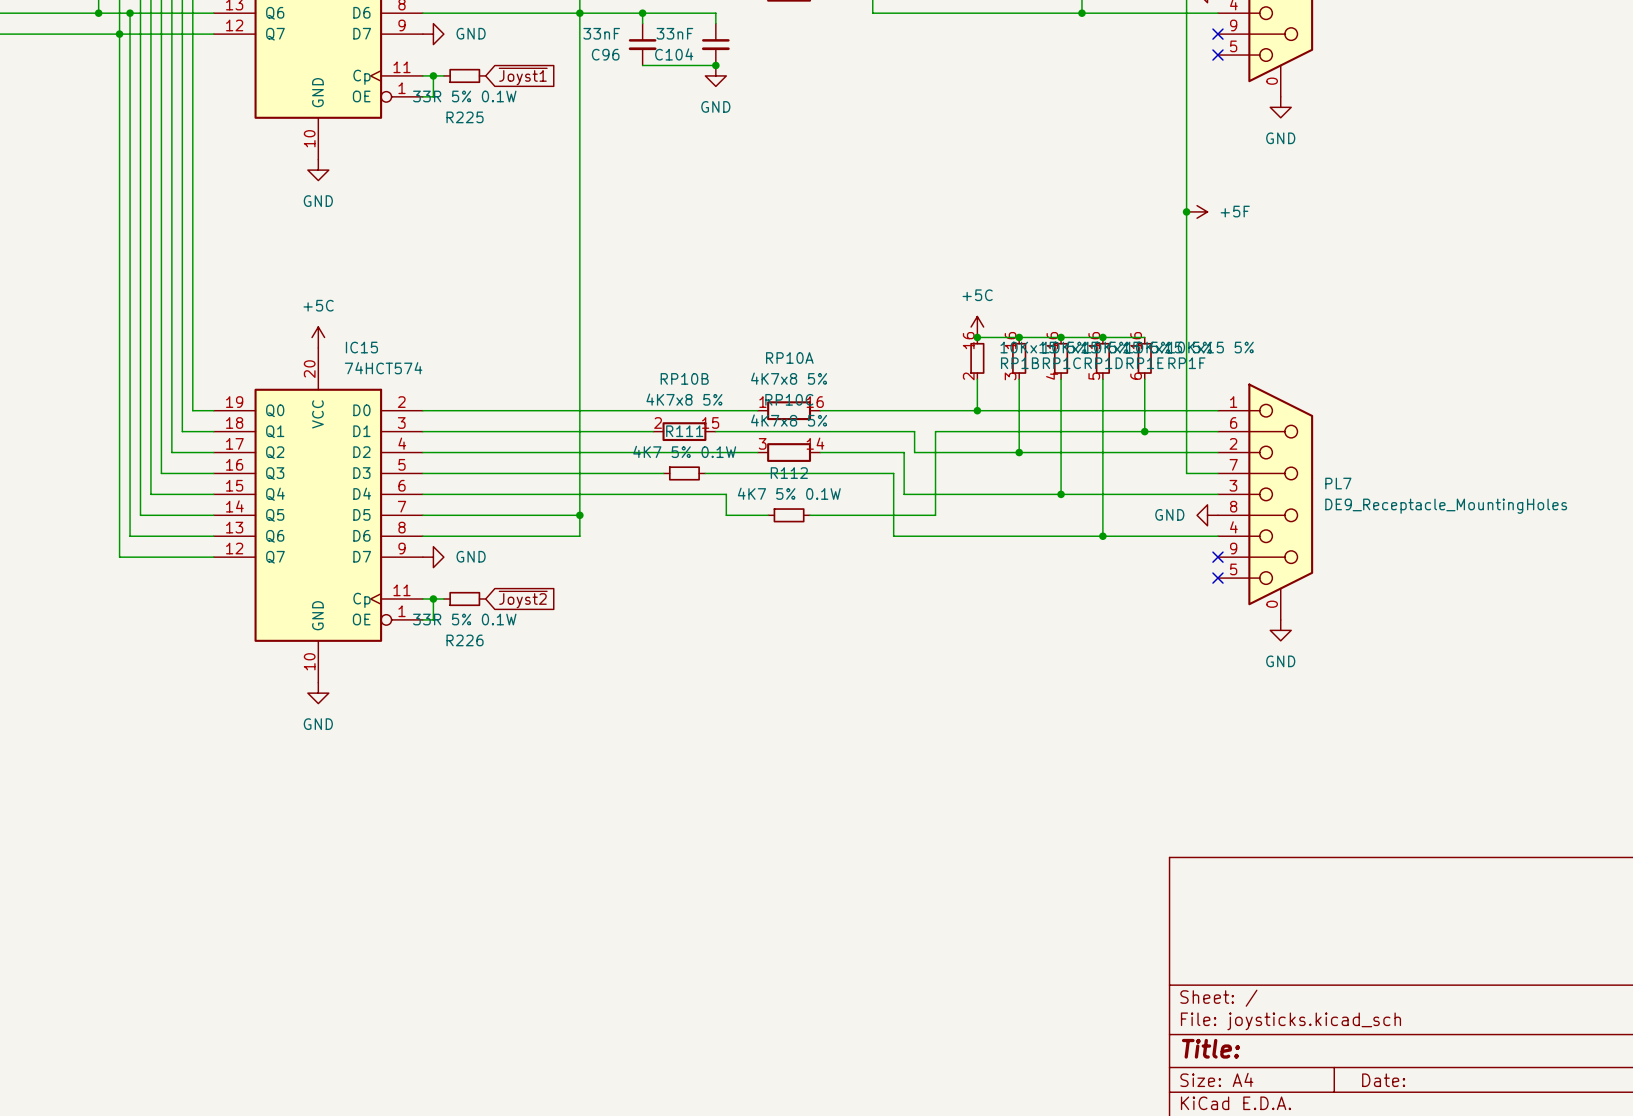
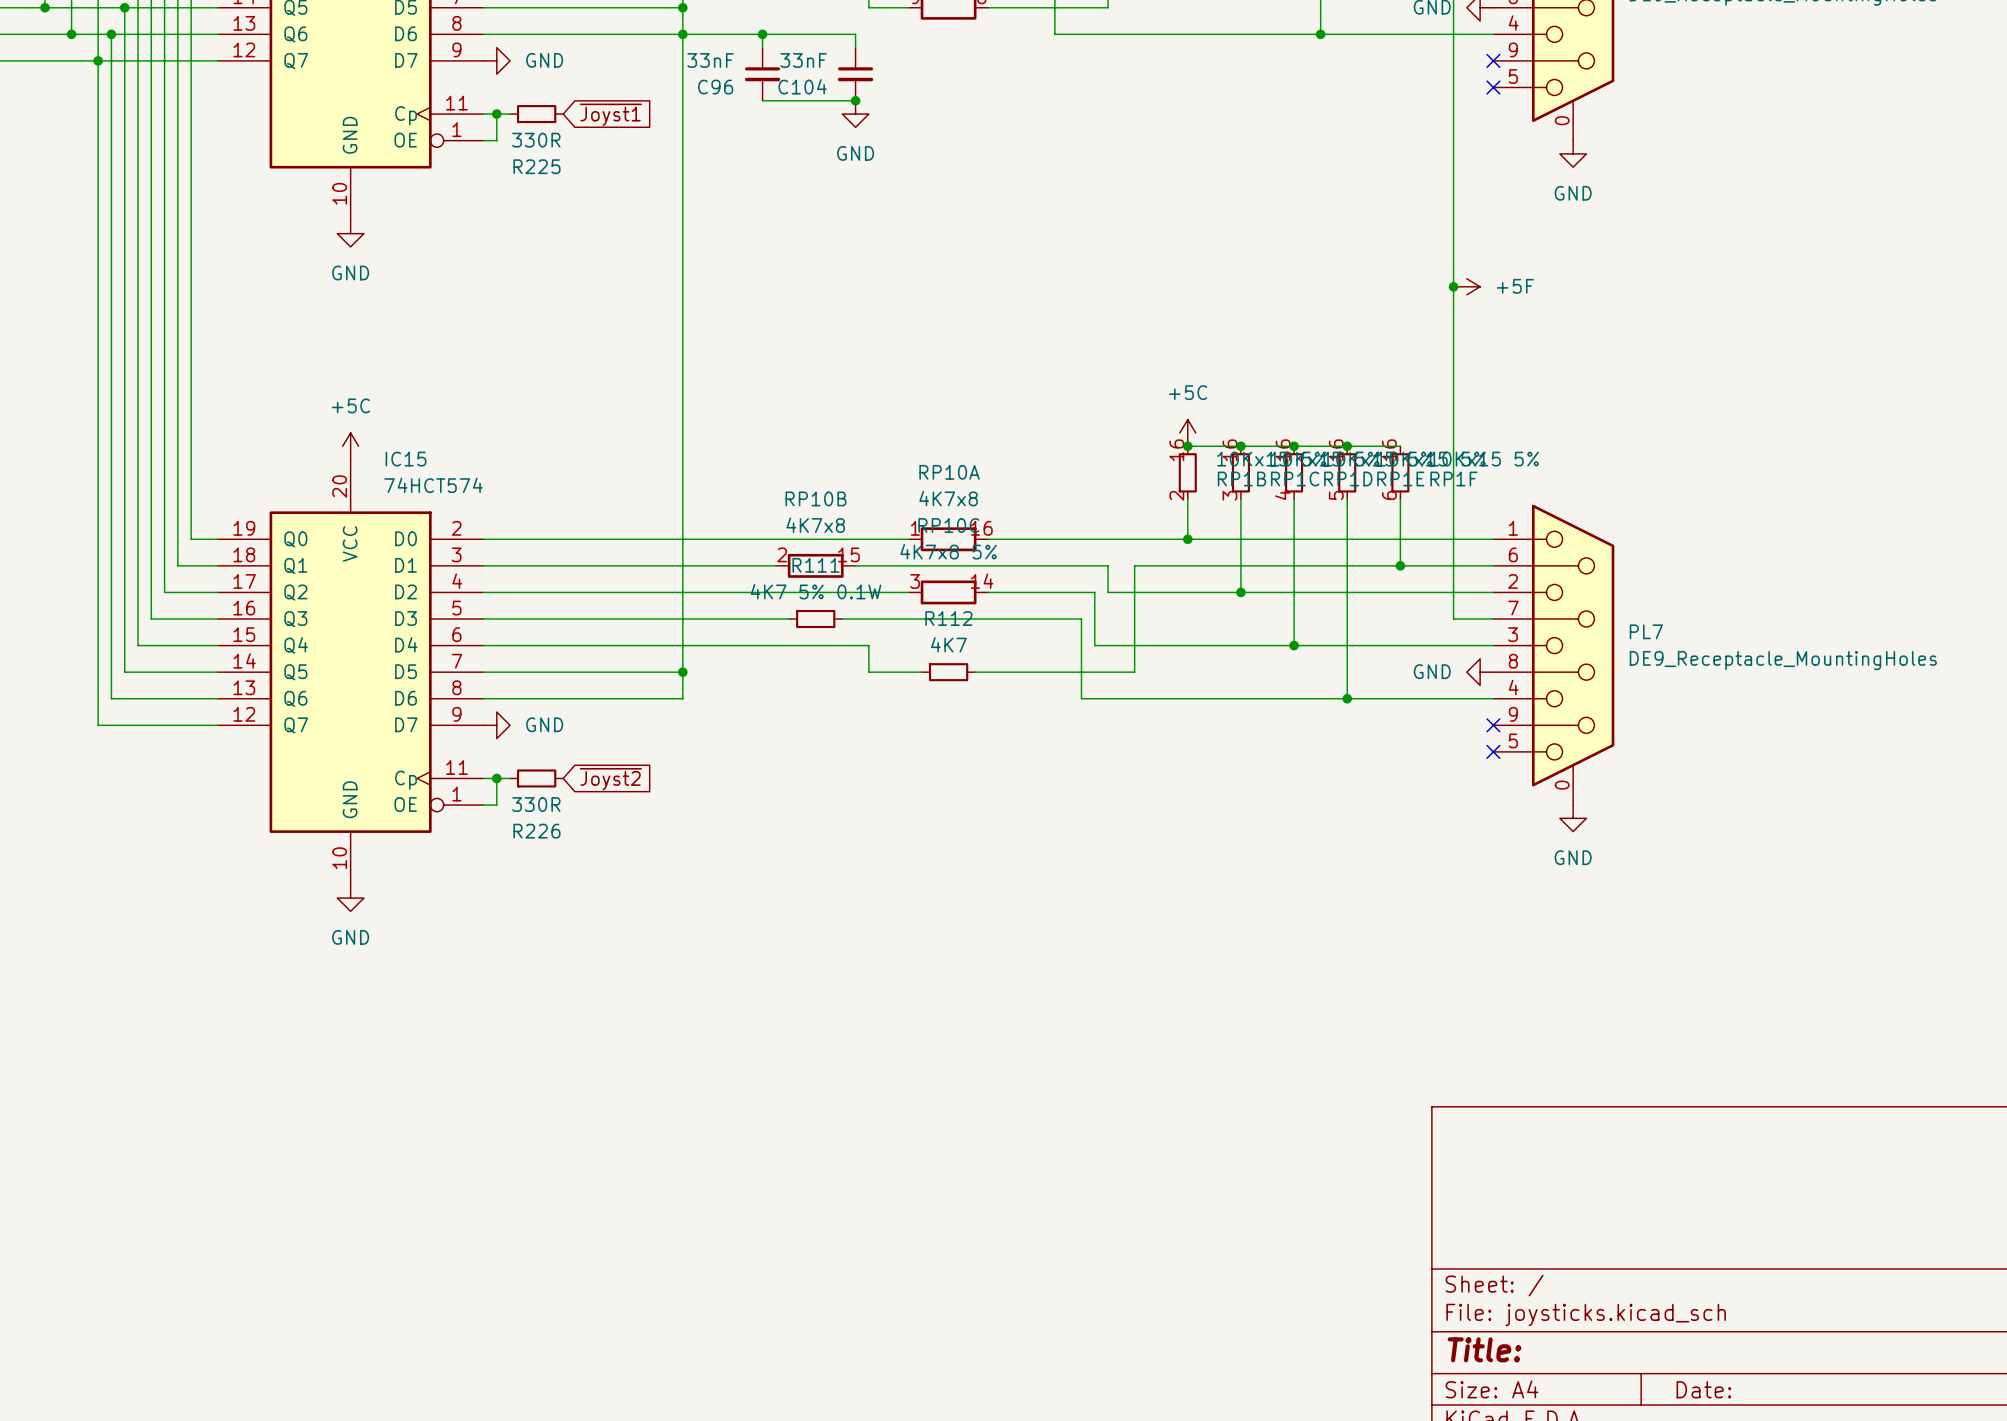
R225 value: 33R 5% 0.1W (464, 96) -> 330R (536, 140)
RP10A value: 4K7x8 5% (789, 378) -> 4K7x8 (948, 498)
RP10B value: 4K7x8 5% (684, 399) -> 4K7x8 (815, 525)
R112 value: 4K7 5% 0.1W (789, 493) -> 4K7 (948, 644)
R226 value: 33R 5% 0.1W (464, 619) -> 330R (536, 804)

